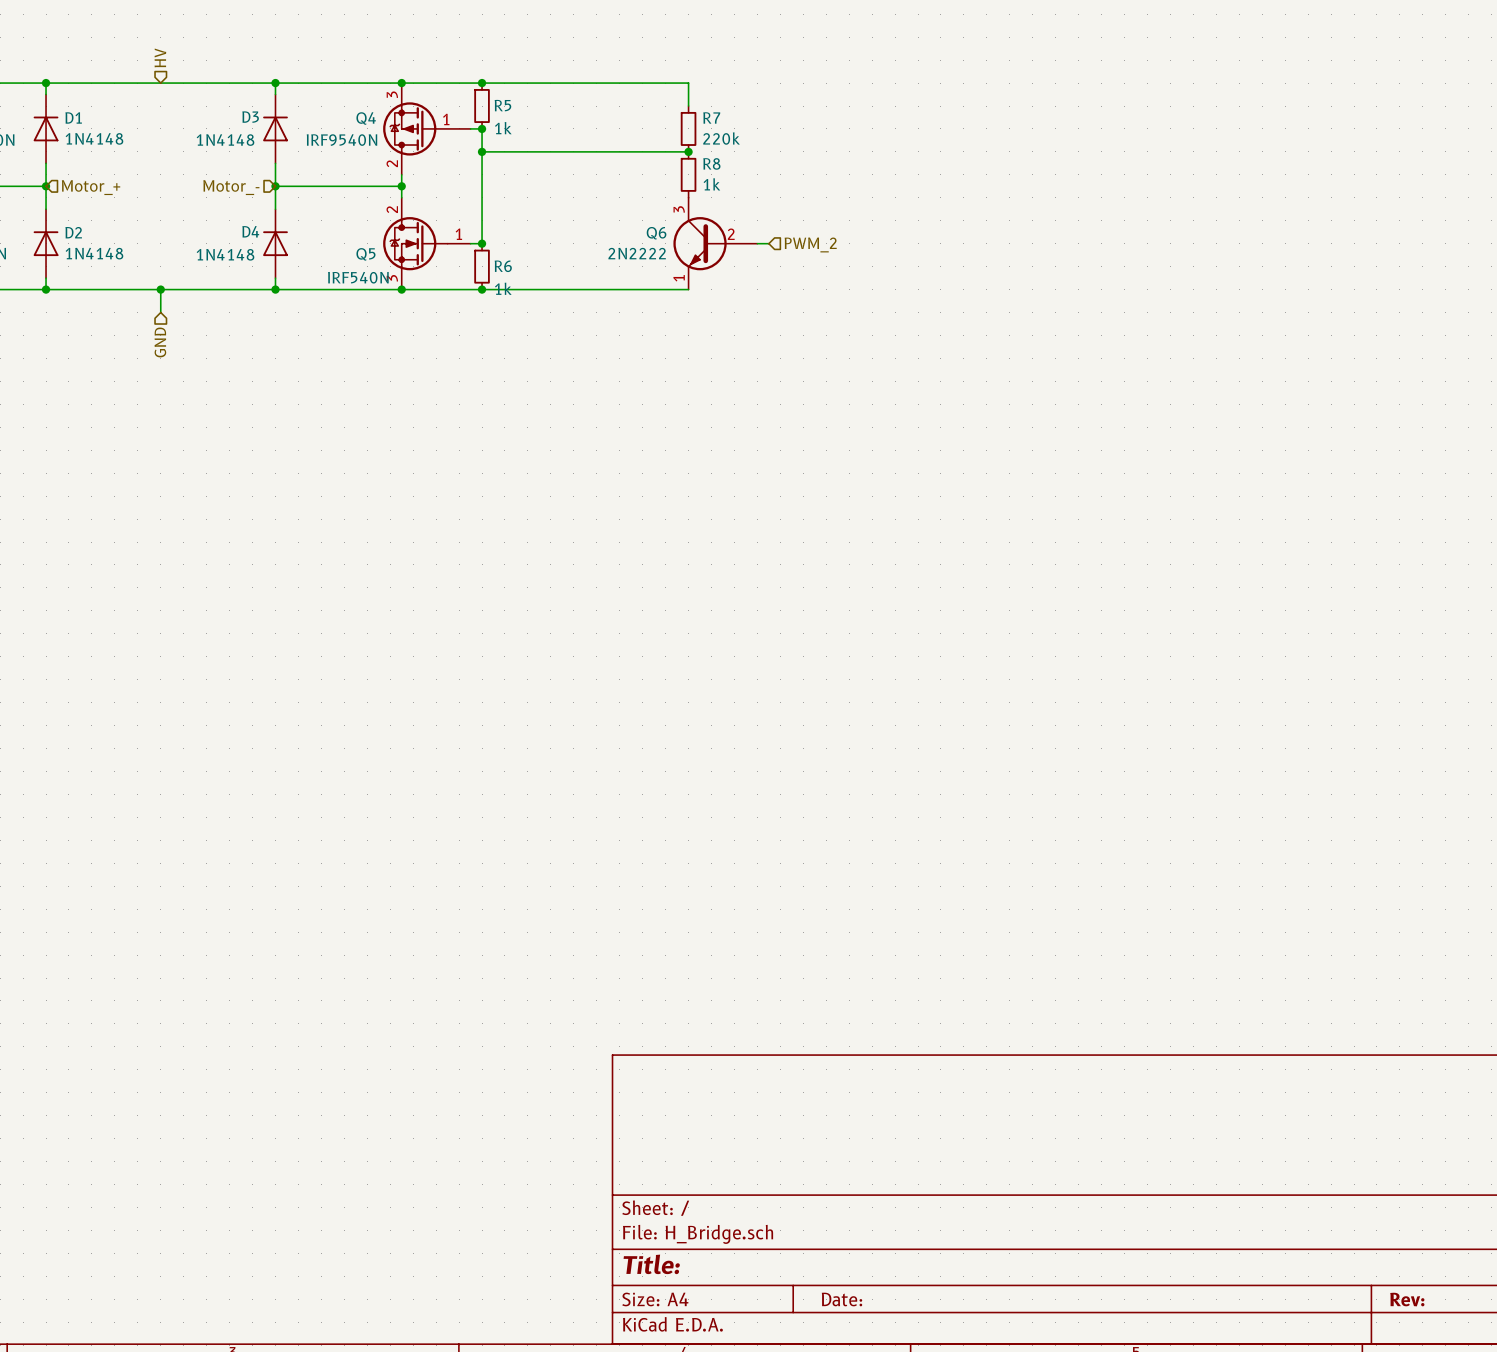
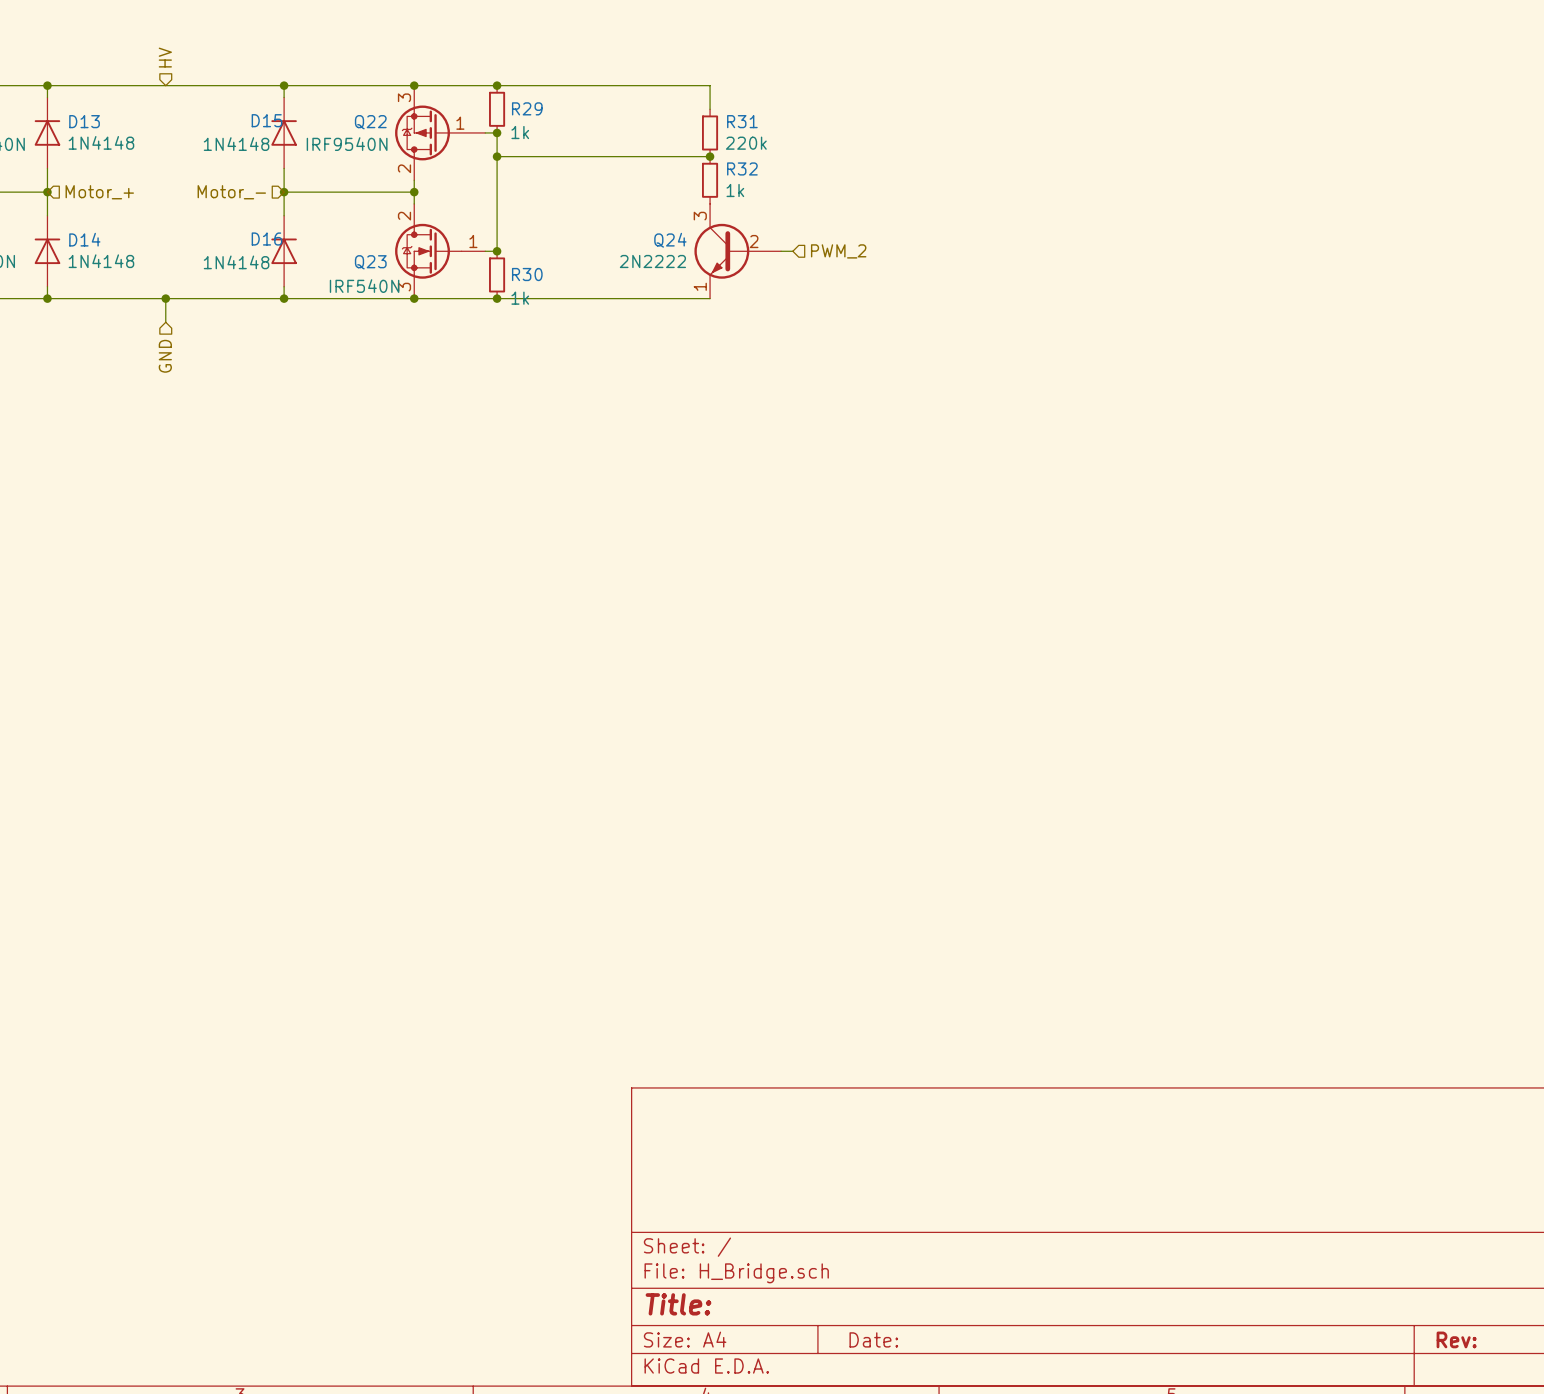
R5 name: R5 (502, 105) -> R29 (527, 108)
D1 name: D1 (73, 117) -> D13 (84, 121)
D3 name: D3 (250, 117) -> D15 (266, 120)
R7 name: R7 (711, 117) -> R31 (742, 121)
Q4 name: Q4 (366, 118) -> Q22 (370, 122)
R8 name: R8 (711, 163) -> R32 (742, 168)
D4 name: D4 (250, 231) -> D16 (266, 239)
D2 name: D2 (73, 232) -> D14 (84, 239)
Q6 name: Q6 (656, 233) -> Q24 (670, 240)
Q5 name: Q5 (365, 254) -> Q23 (370, 262)
R6 name: R6 (503, 266) -> R30 (527, 274)

